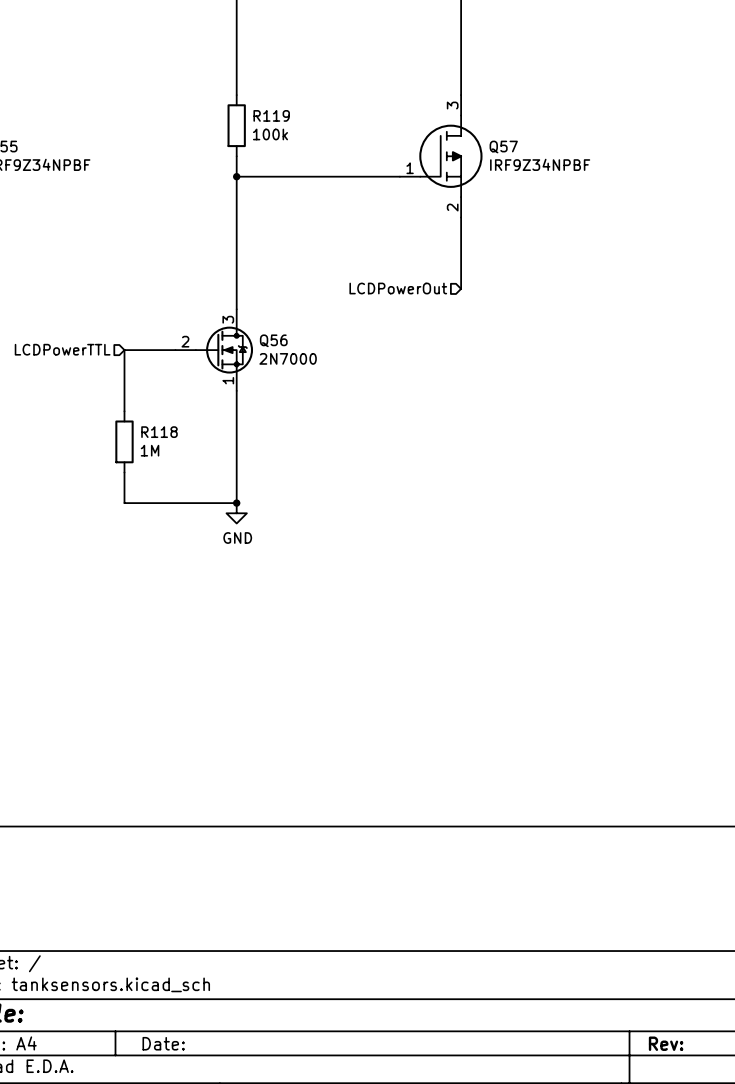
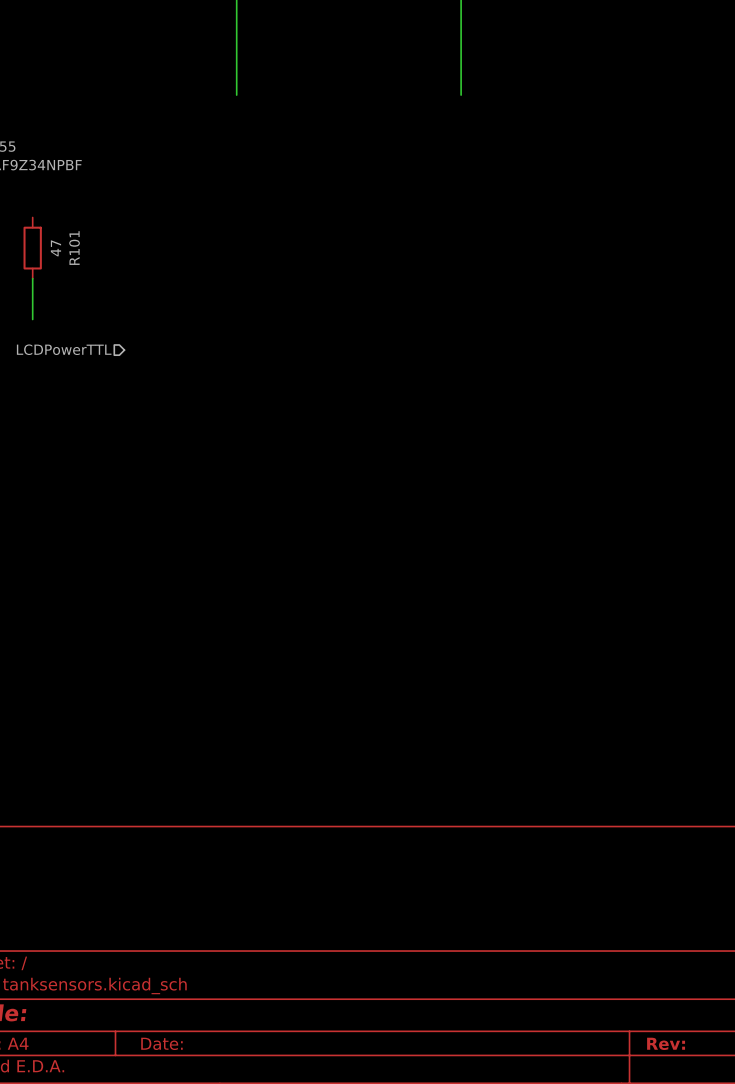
R119: 100k (236, 125) -> none
wire: (236, 156) (236, 309) -> none
Q57: IRF9Z34NPBF (441, 156) -> none
wire: (236, 176) (399, 176) -> none
junction: (236, 176) -> none
wire: (461, 217) (461, 288) -> none
R101: none -> 47 (32, 248)
wire: none -> (32, 278) (32, 319)
hierarchical label: LCDPowerOut (398, 288) -> none
wire: (175, 350) (124, 350) (124, 411) -> none
Q56: 2N7000 (214, 350) -> none
wire: (236, 390) (236, 503) (124, 503) (124, 472) -> none
R118: 1M (124, 441) -> none
junction: (236, 503) -> none
power symbol: GND (236, 513) -> none

